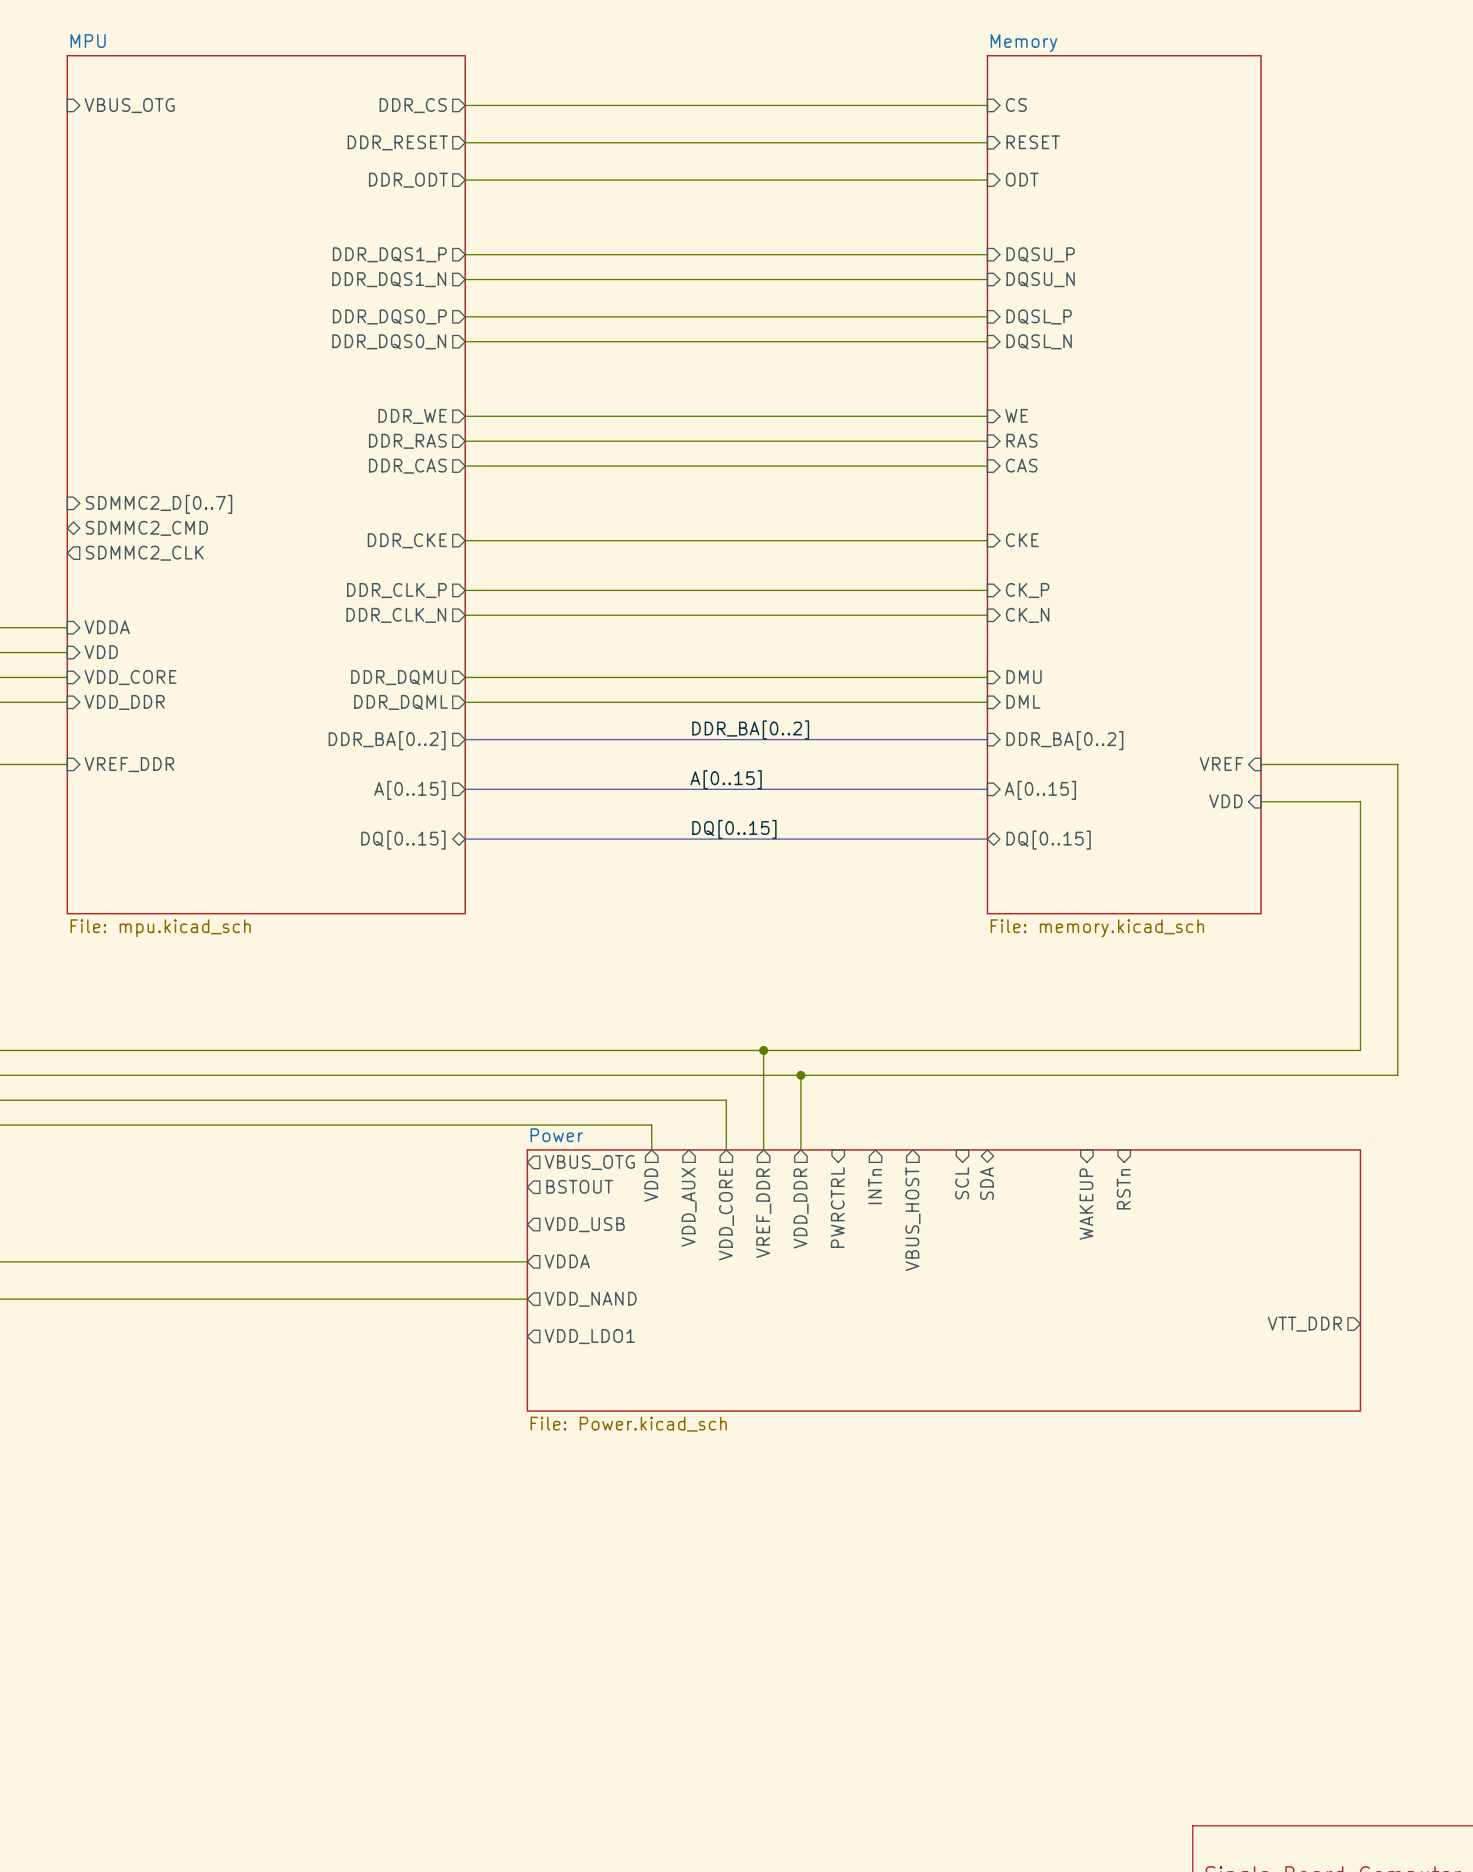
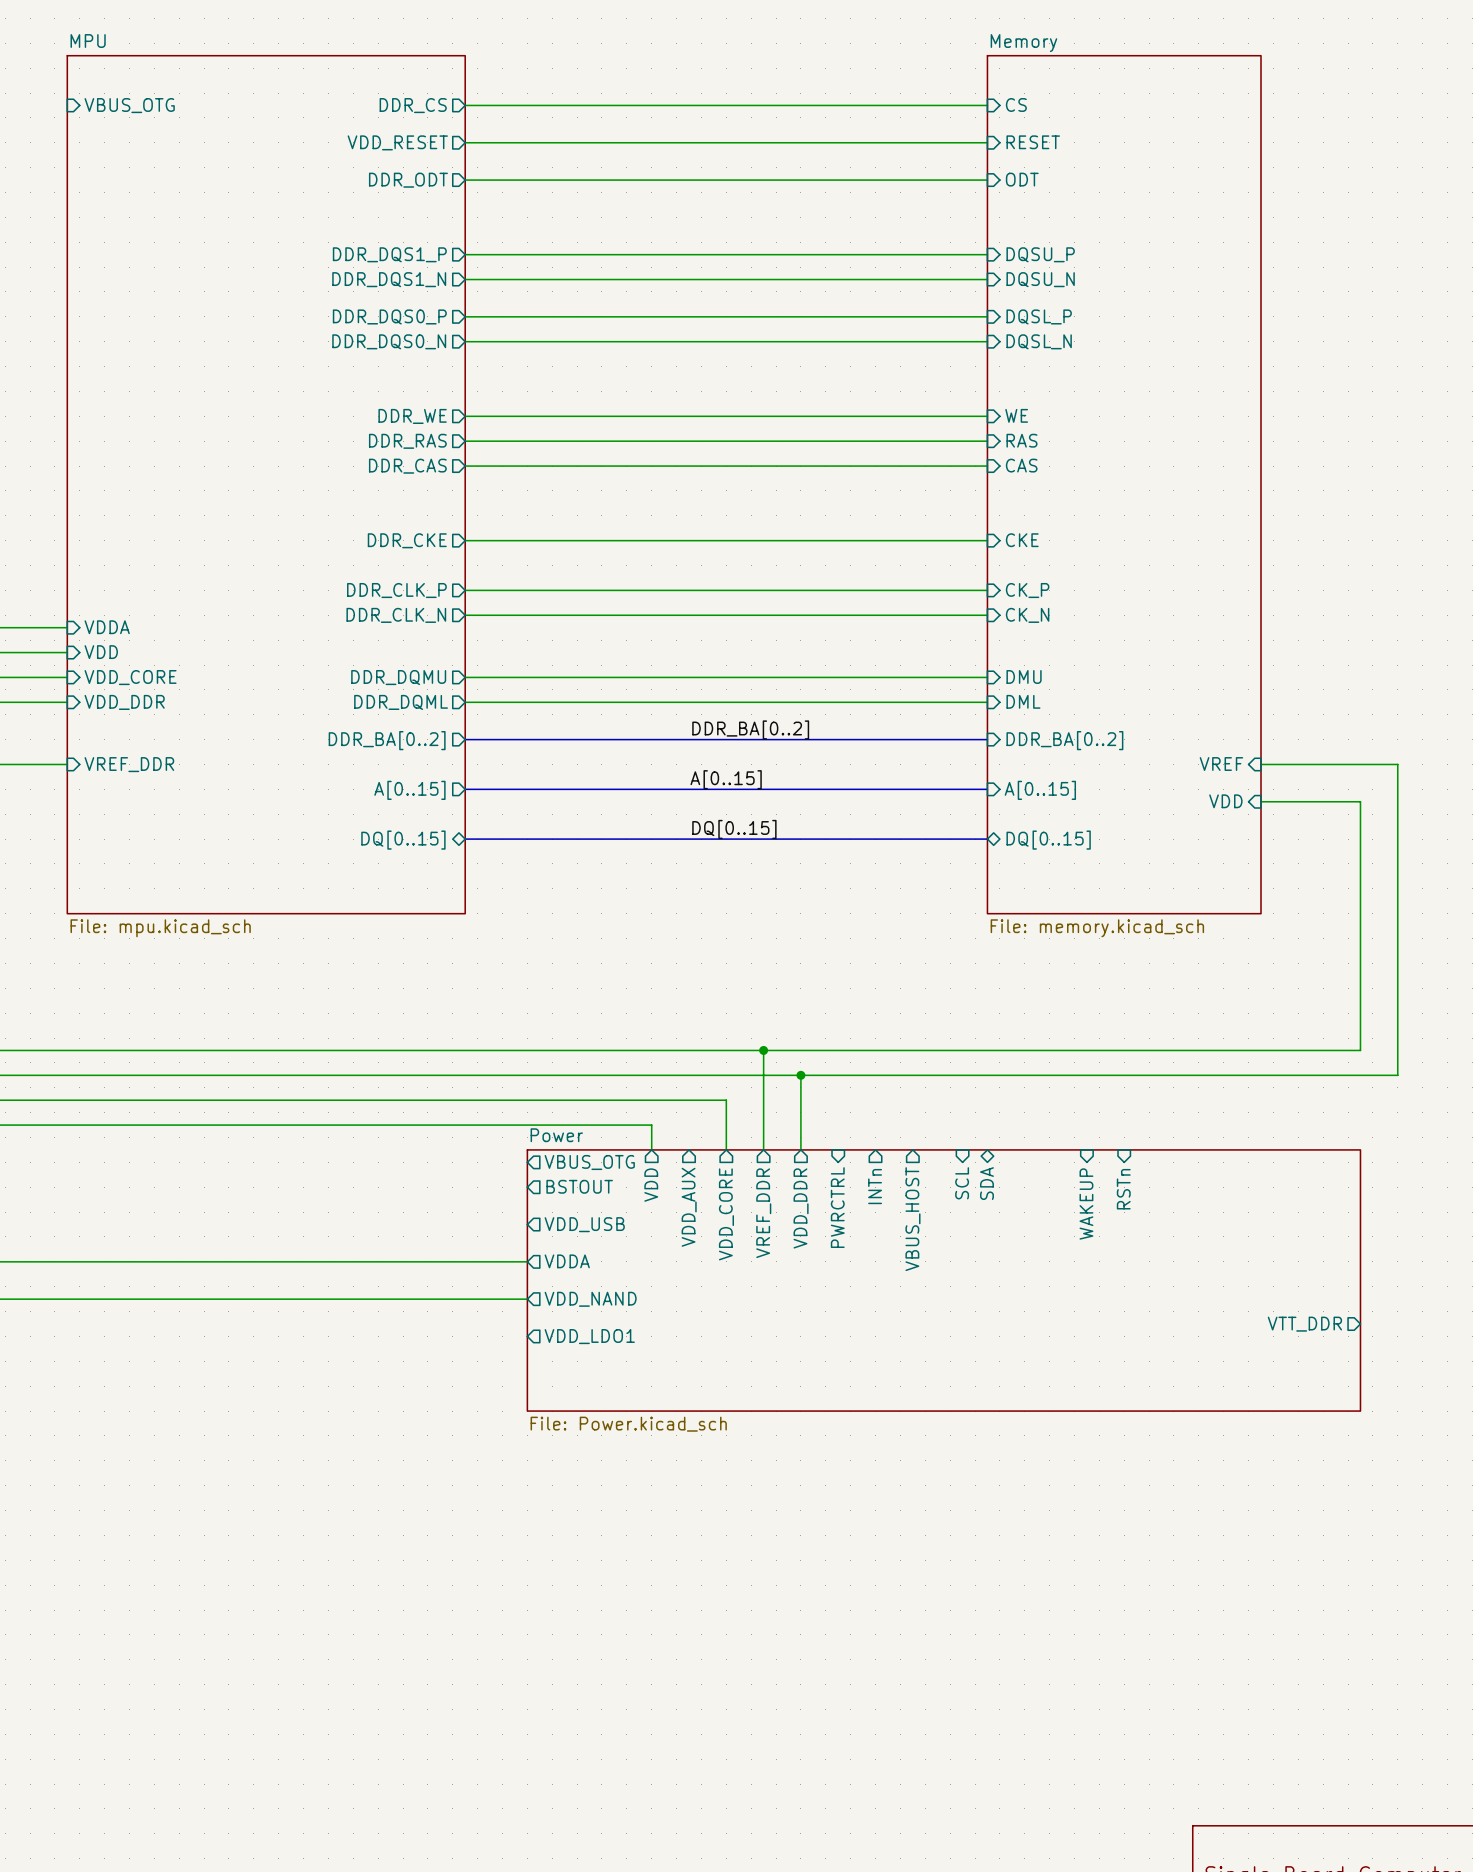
sheet pin: DDR_RESET (397, 142) -> VDD_RESET (397, 142)
sheet pin: SDMMC2_D[0..7] (158, 504) -> none
sheet pin: SDMMC2_CMD (146, 528) -> none
sheet pin: SDMMC2_CLK (144, 553) -> none

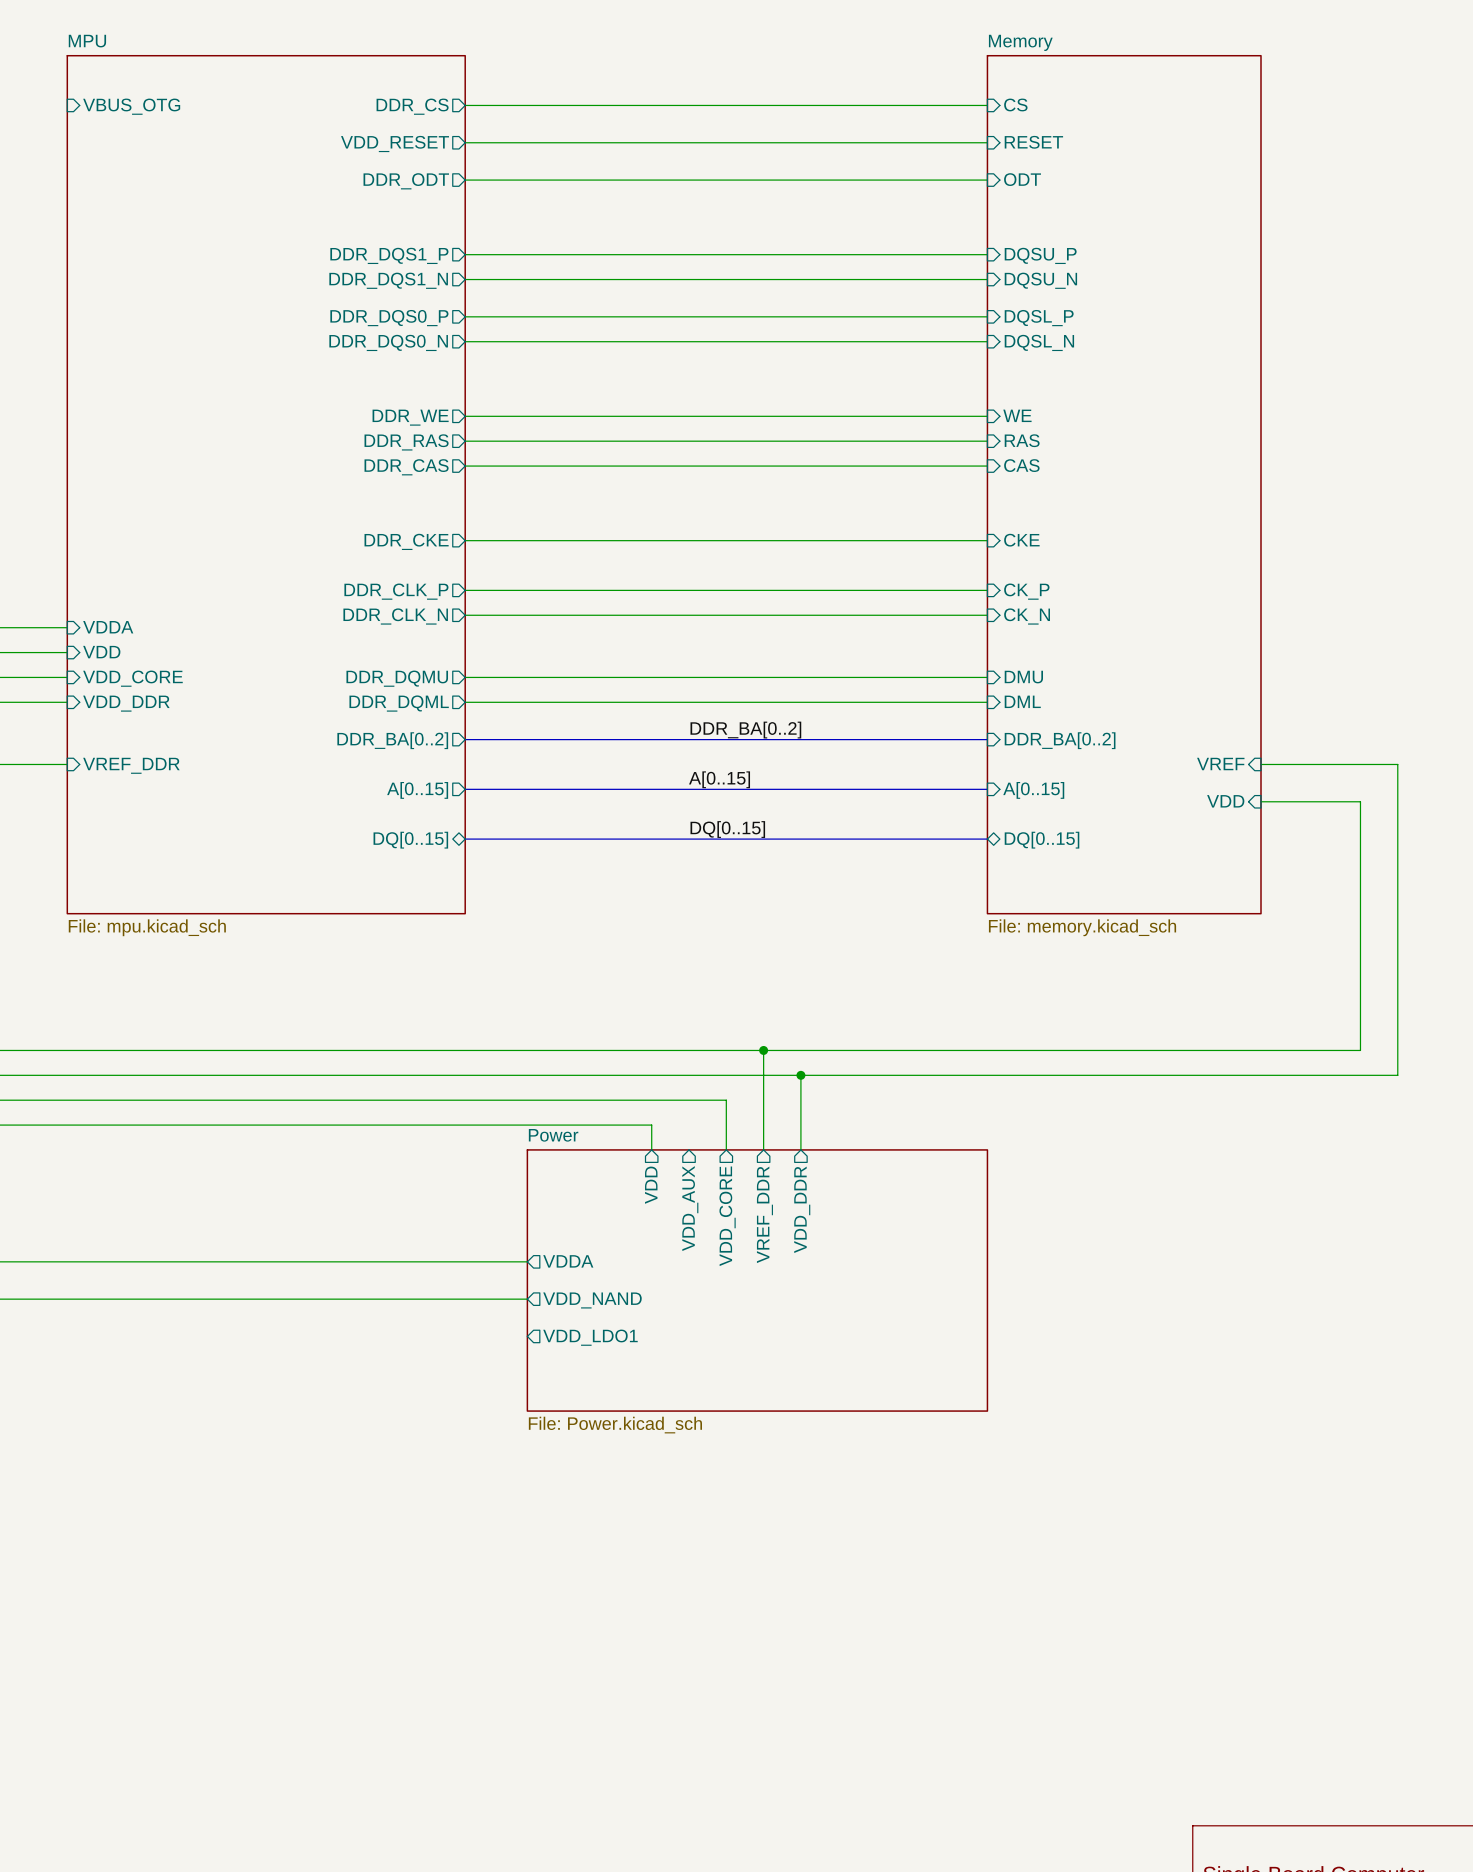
sheet pin: VBUS_OTG (589, 1162) -> none
sheet pin: SCL (962, 1183) -> none
sheet pin: SDA (986, 1183) -> none
sheet pin: BSTOUT (579, 1186) -> none
sheet pin: INTn (875, 1186) -> none
sheet pin: RSTn (1123, 1189) -> none
sheet pin: WAKEUP (1086, 1204) -> none
sheet pin: PWRCTRL (837, 1207) -> none
sheet pin: VBUS_HOST (912, 1219) -> none
sheet pin: VDD_USB (584, 1224) -> none
sheet Power: none -> File: Power.kicad_sch (757, 1280)
sheet Power: File: Power.kicad_sch (943, 1280) -> none
sheet pin: VTT_DDR (1304, 1324) -> none

